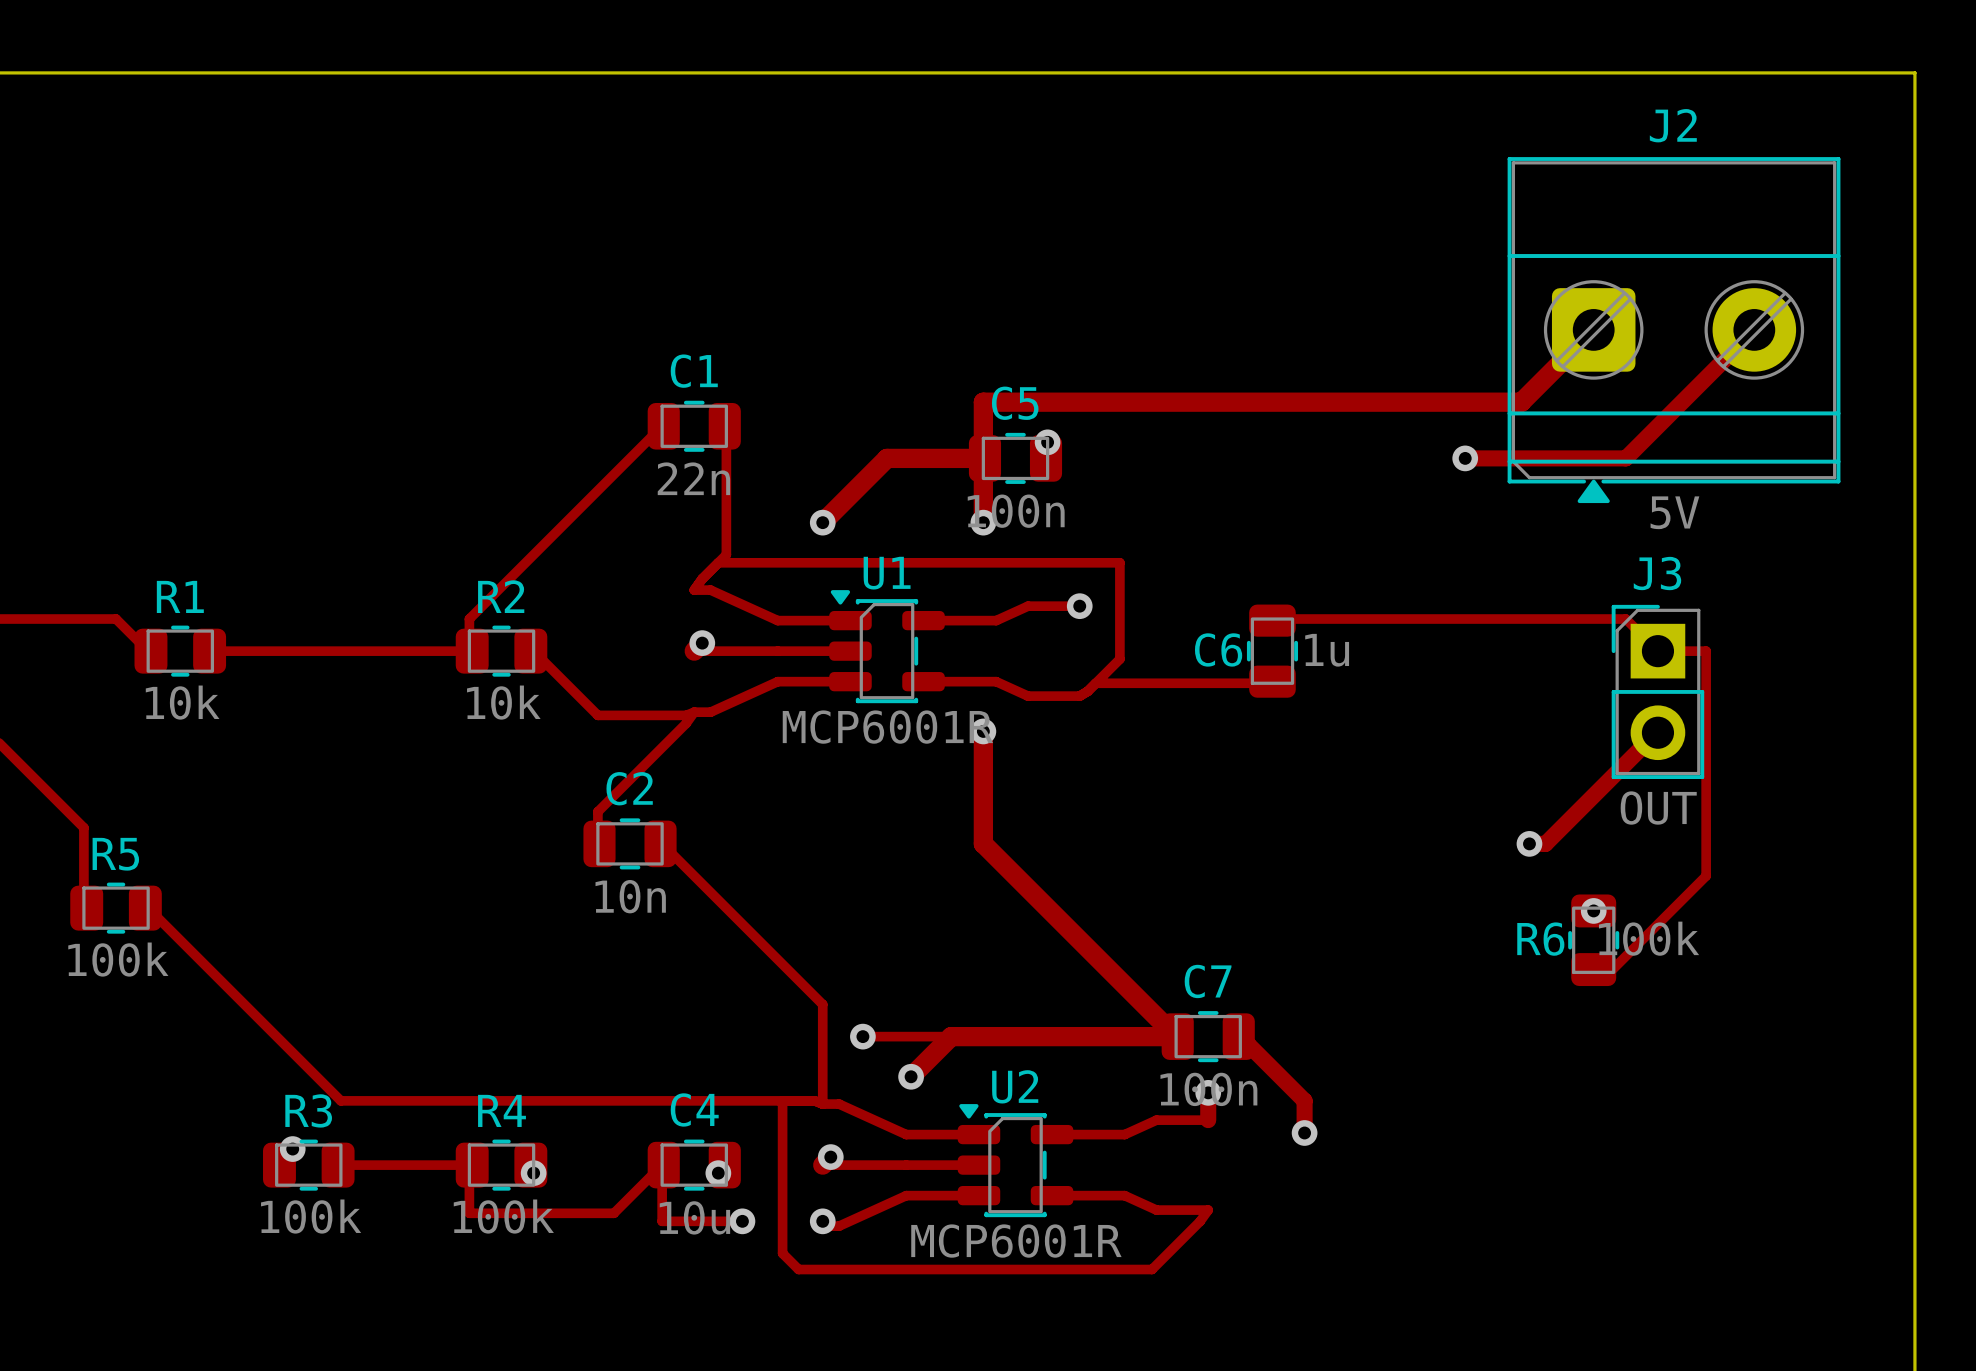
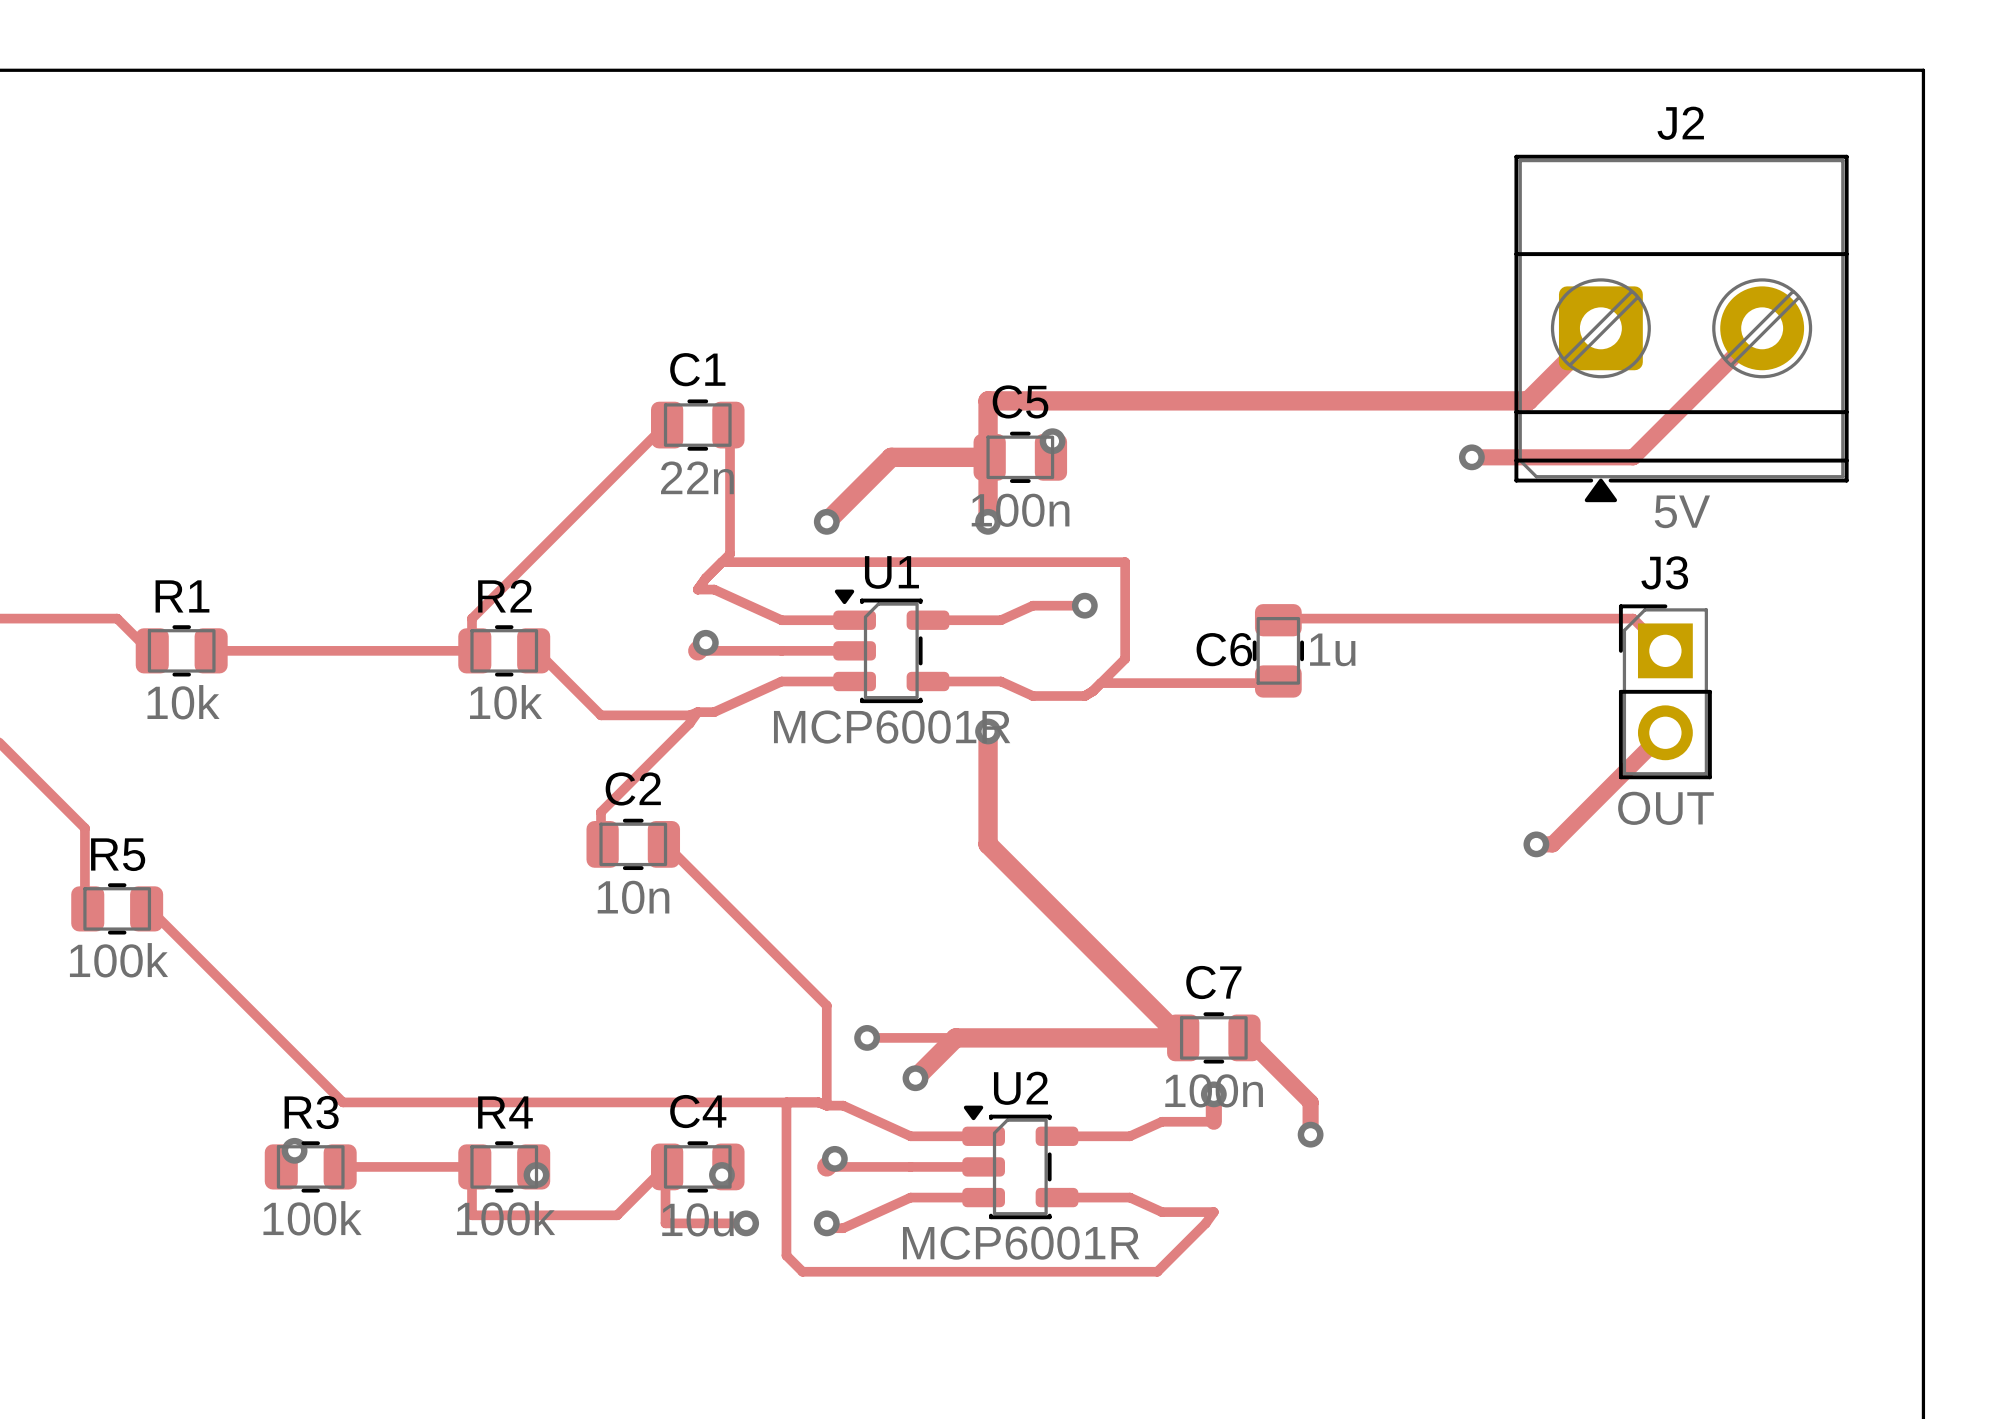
track: (1657, 651) (1706, 651) (1706, 876) (1609, 972) (1593, 969) -> none
via: (1593, 910) -> none
R6: 100k (1593, 940) -> none

